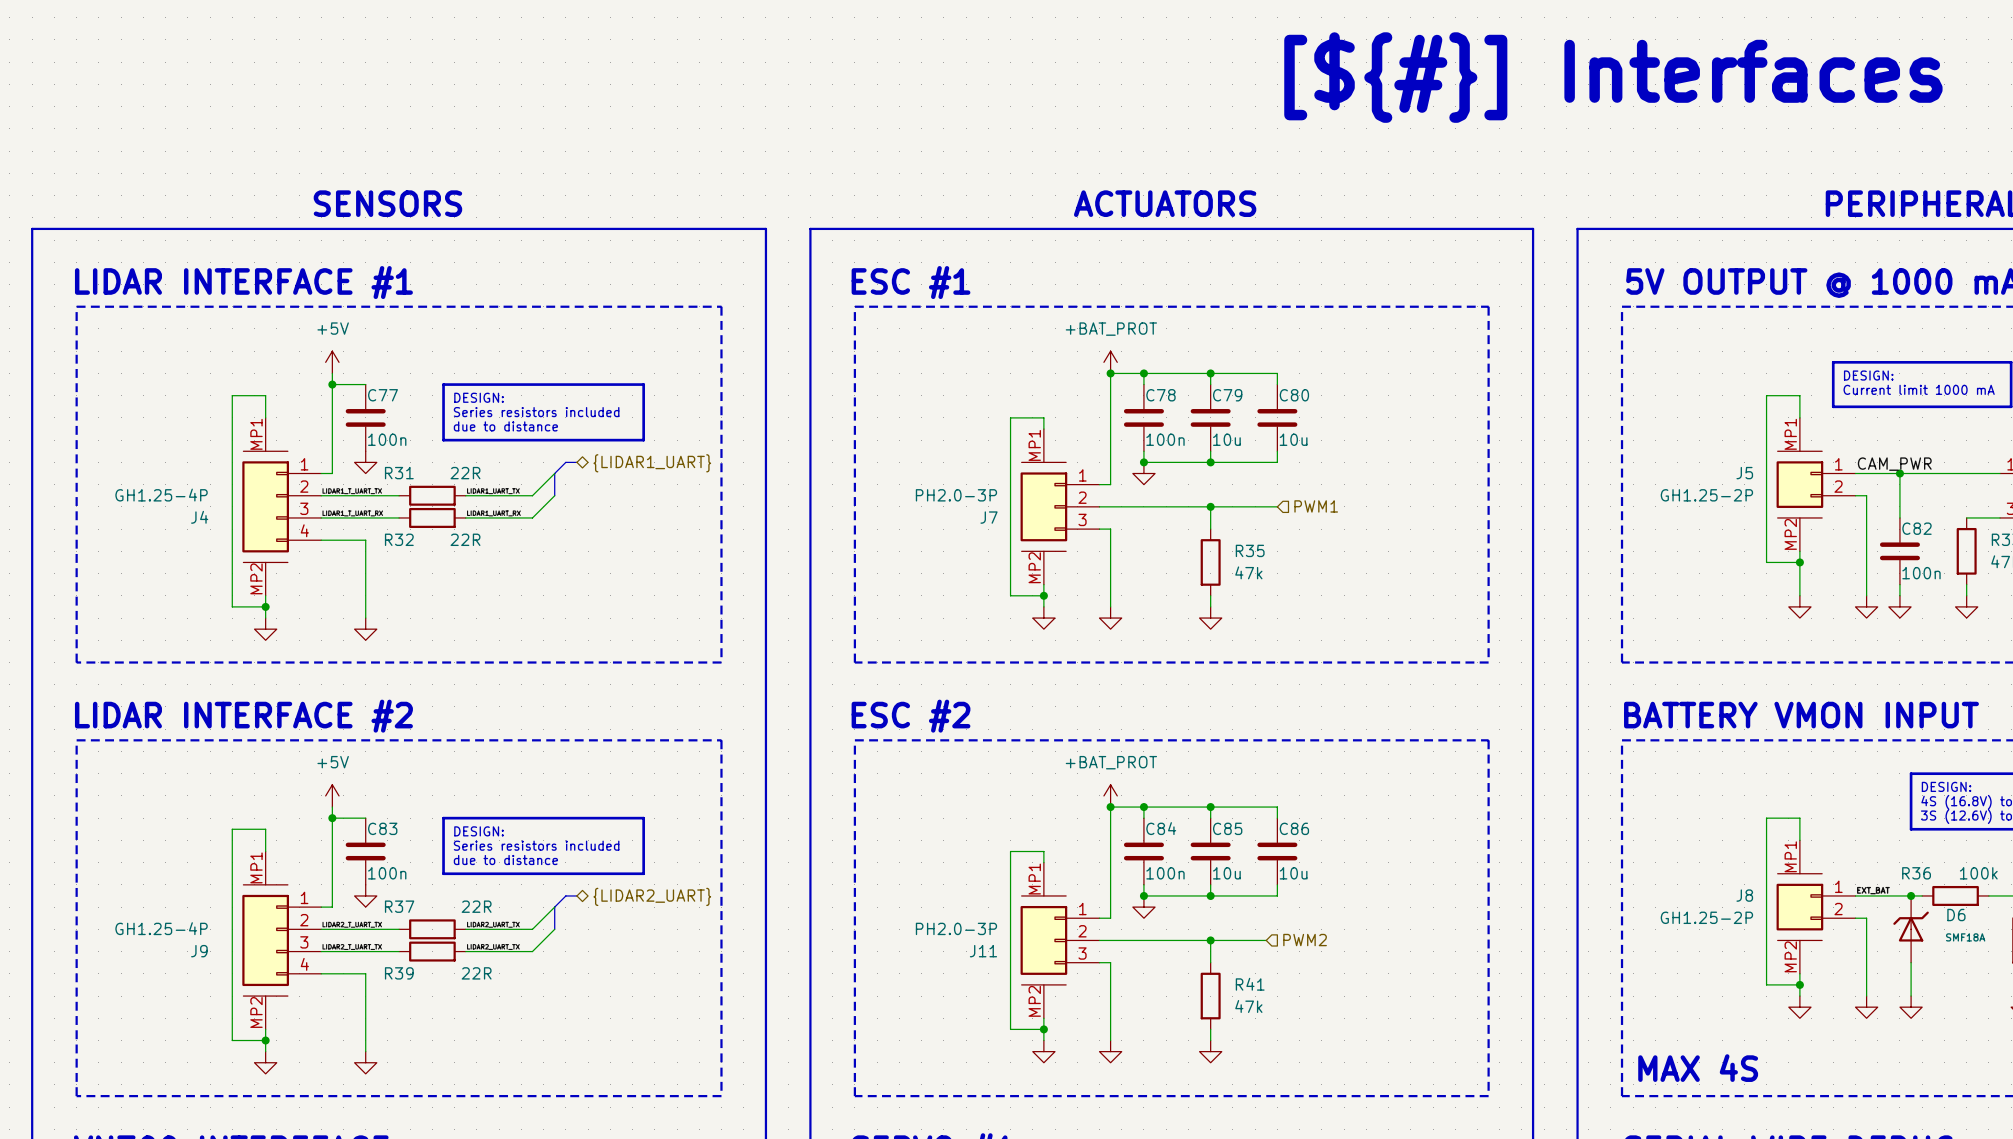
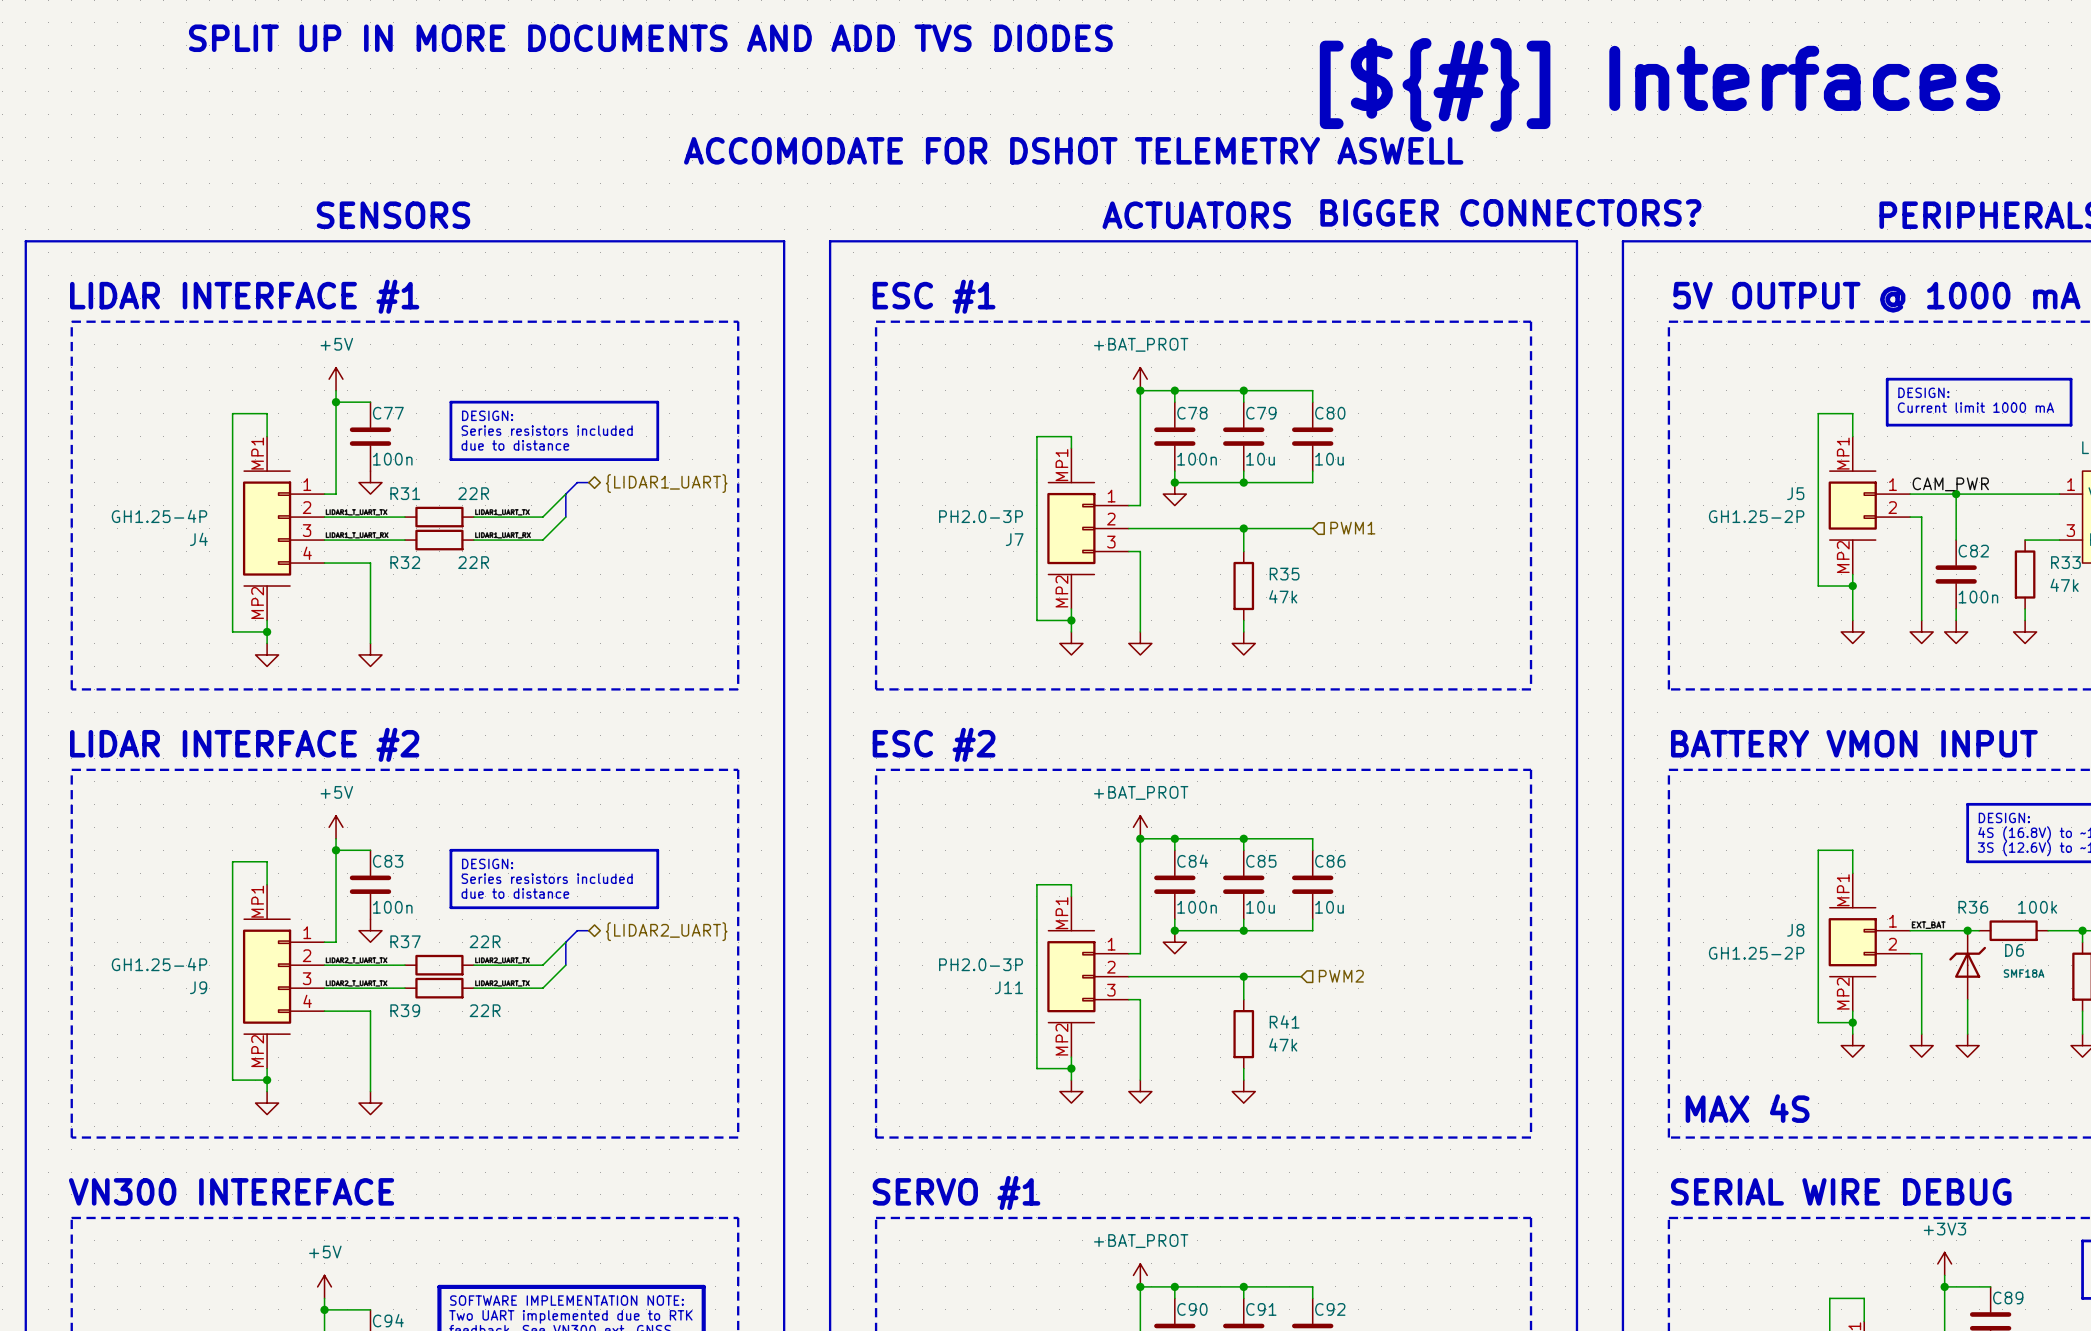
text: none -> SPLIT UP IN MORE DOCUMENTS AND ADD TVS DIODES (650, 38)
text: none -> ACCOMODATE FOR DSHOT TELEMETRY ASWELL (1073, 150)
text: none -> BIGGER CONNECTORS? (1510, 212)

